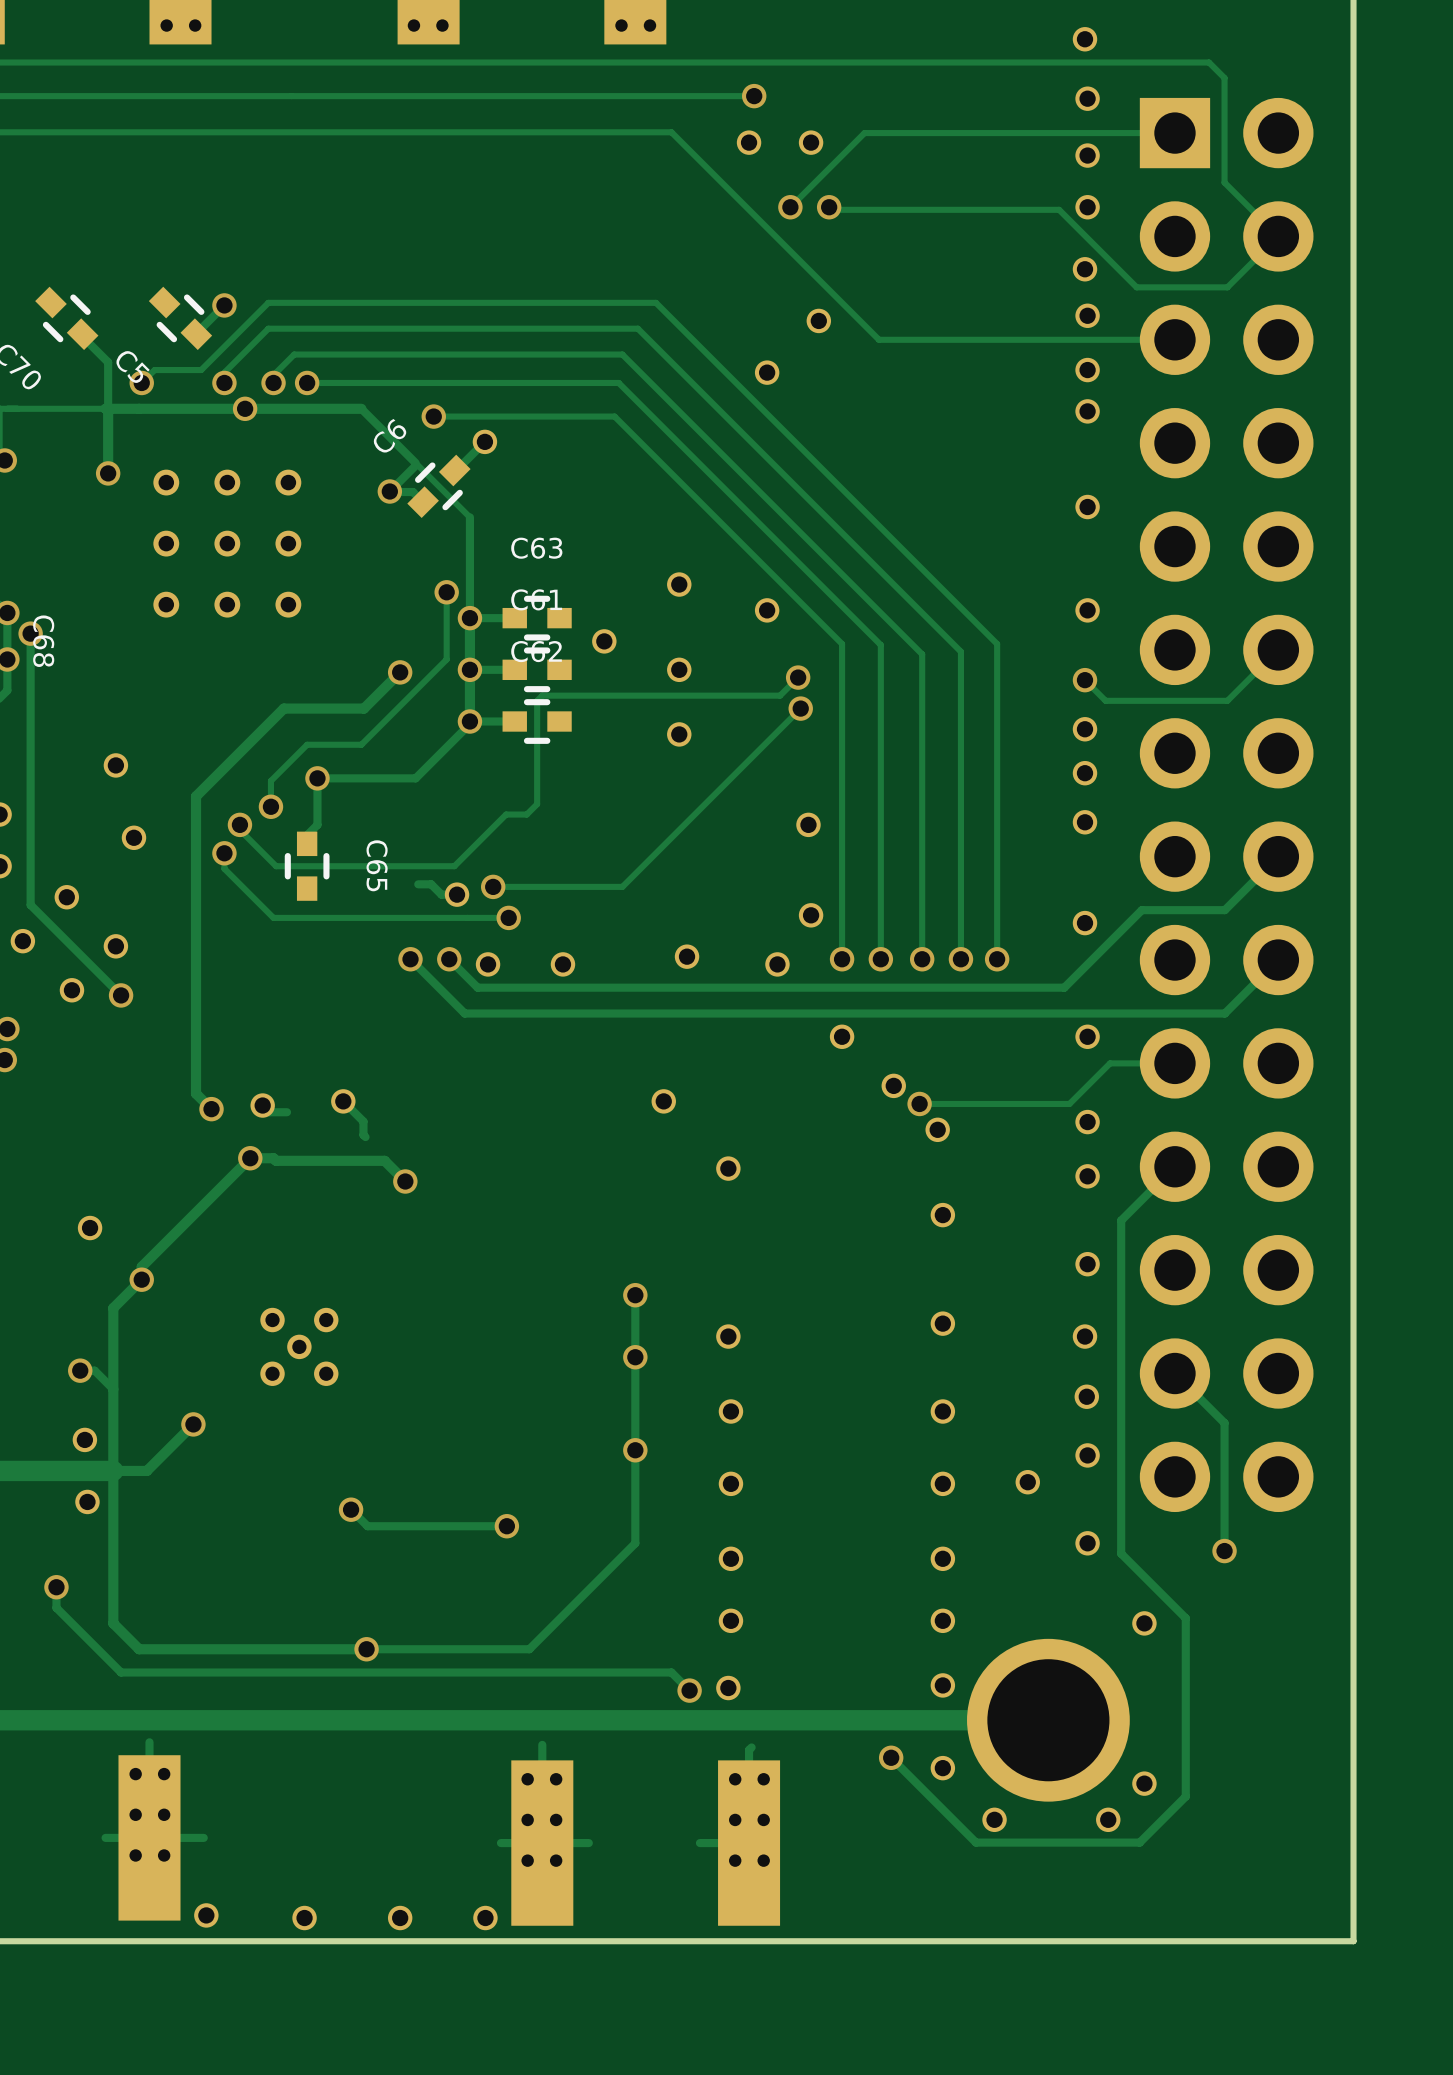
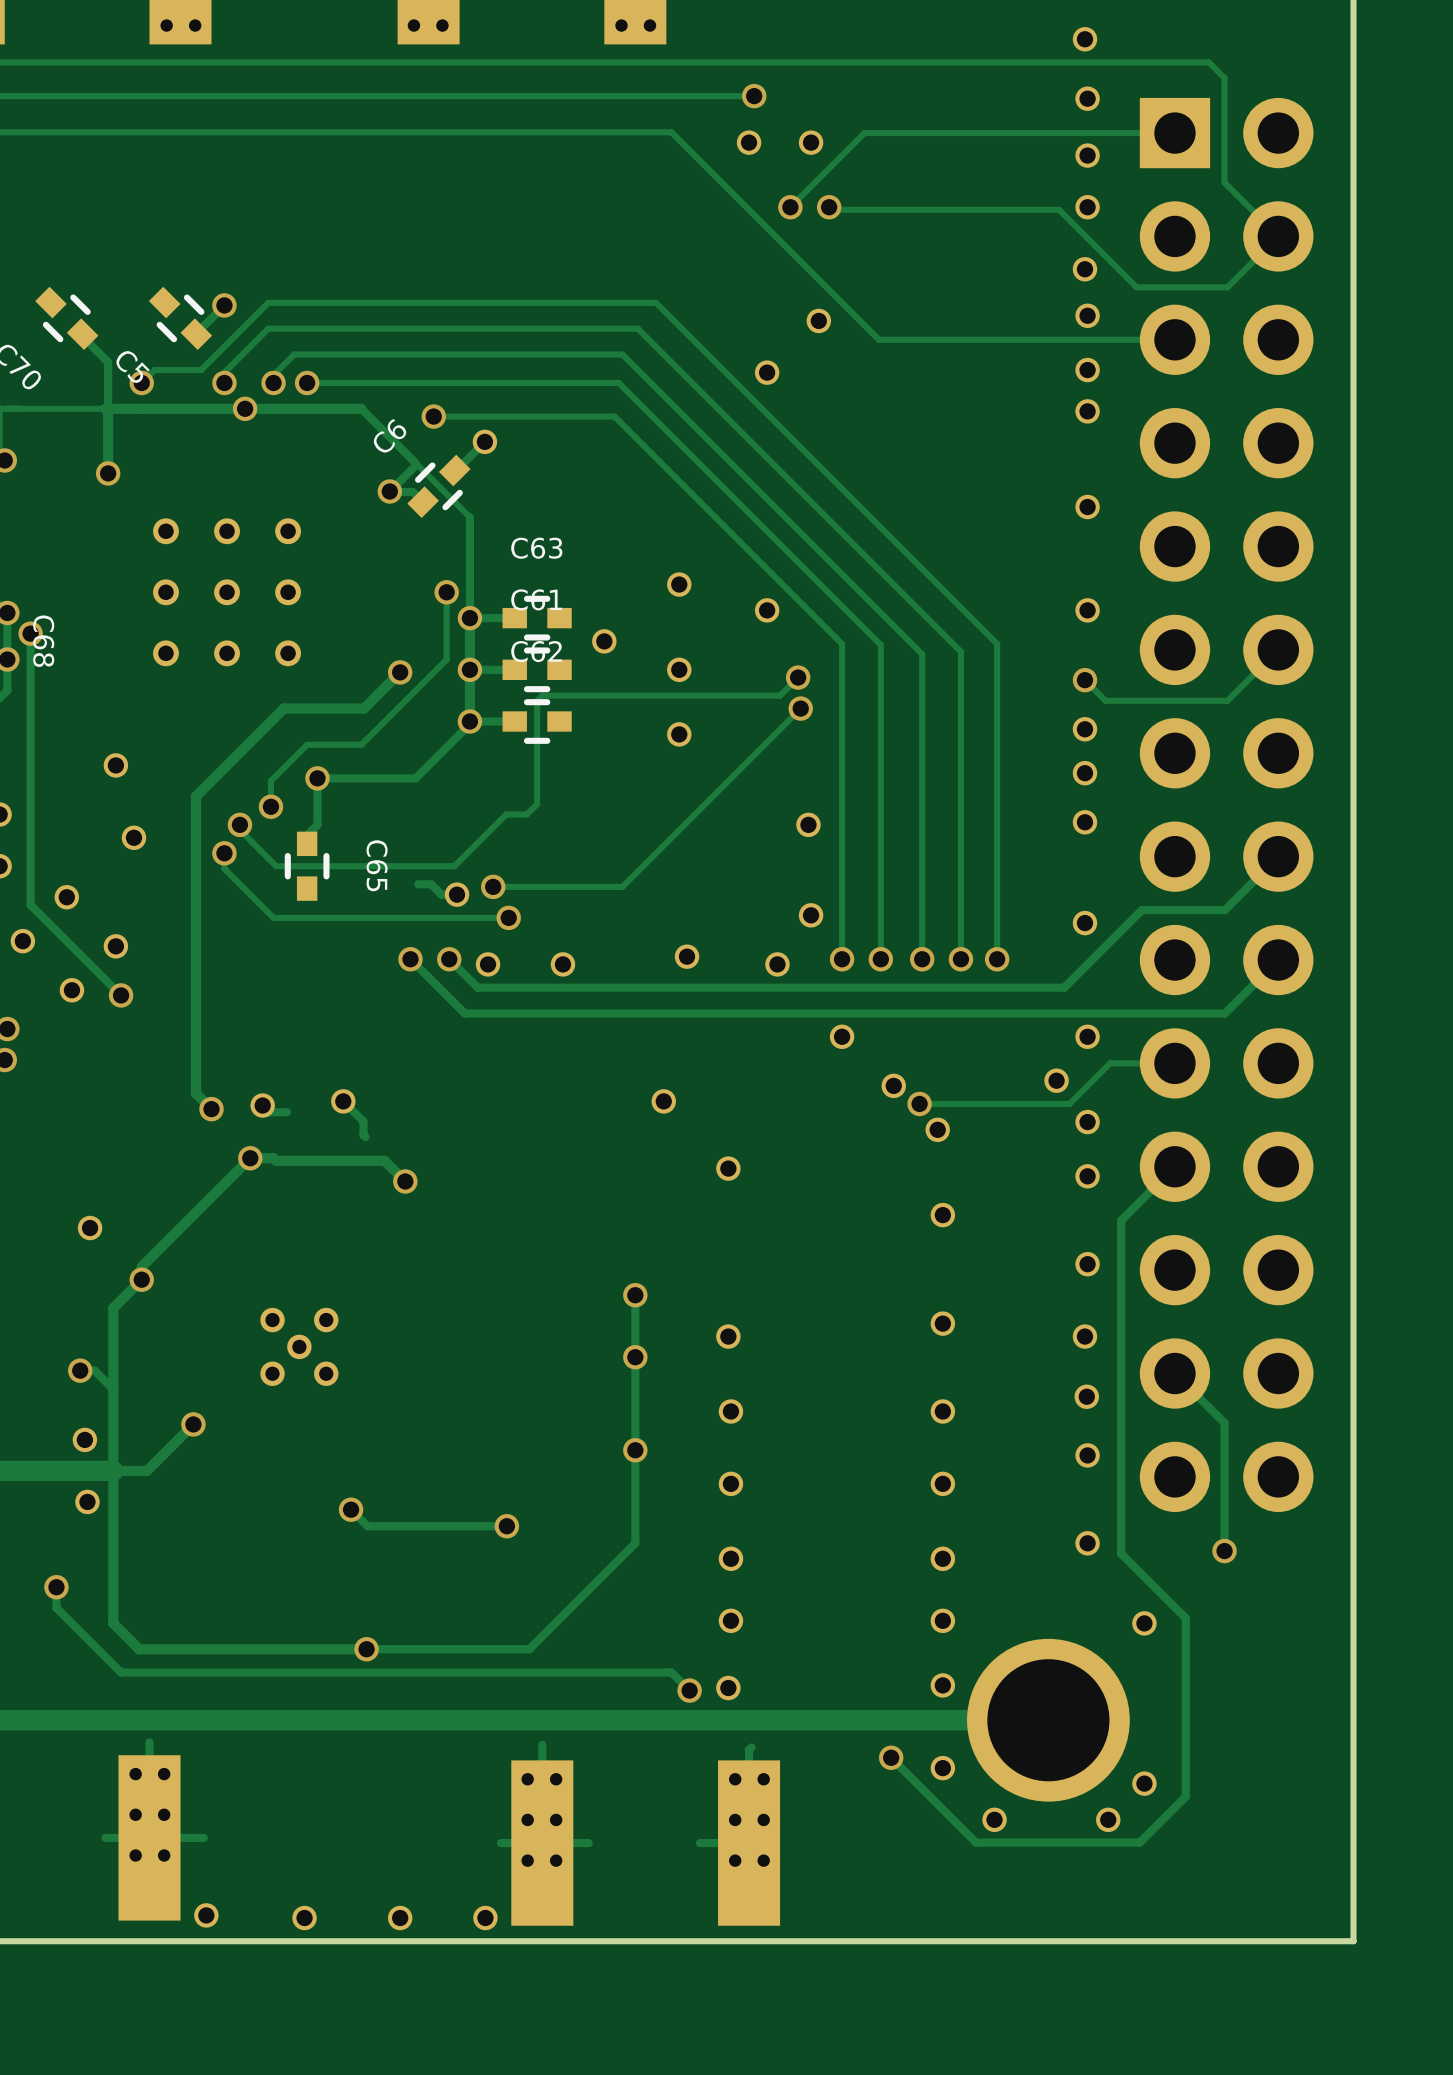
part position: (227, 543) -> (227, 592)
part position: (1027, 1482) -> (1056, 1080)

